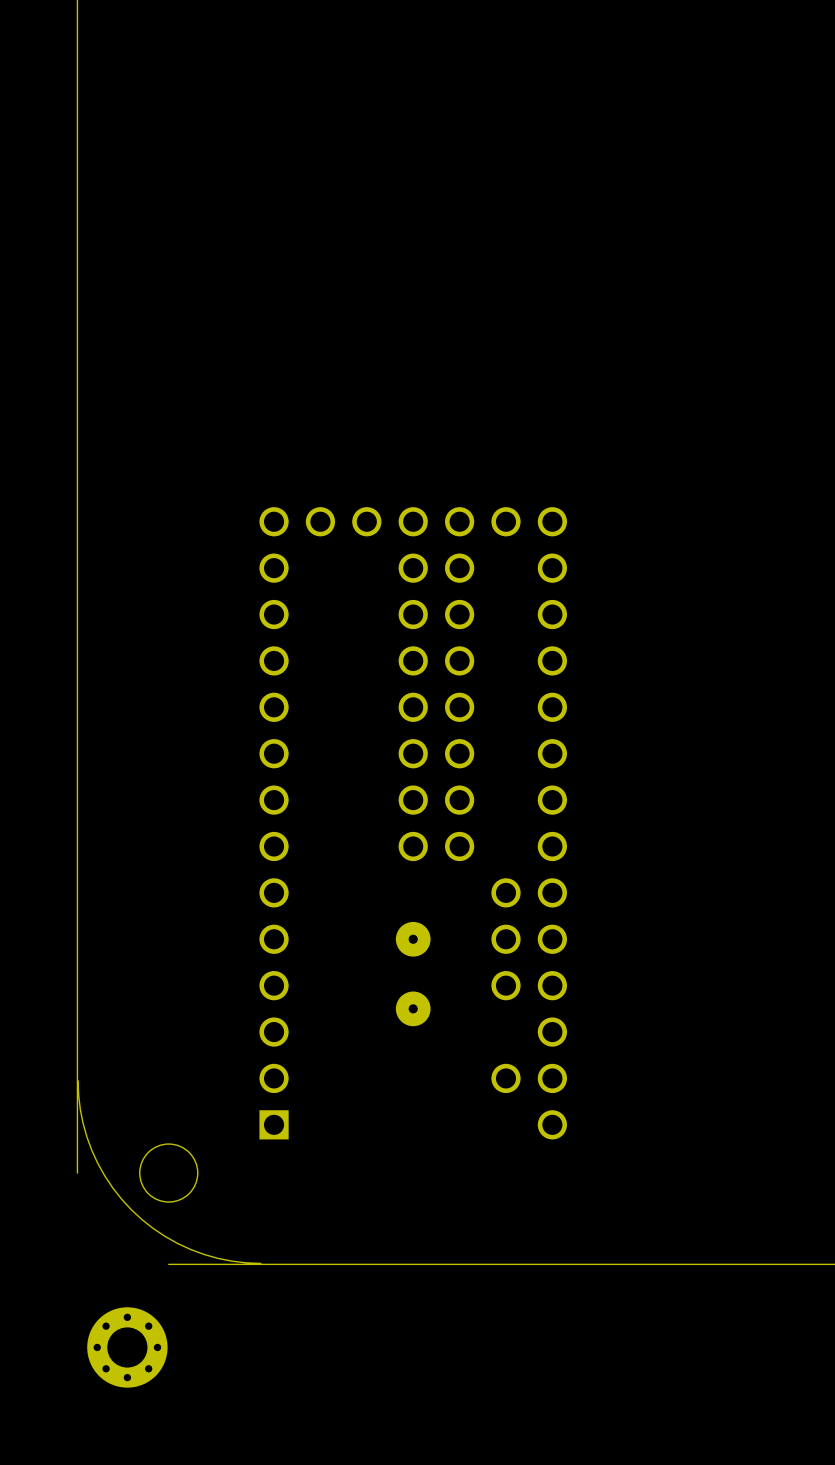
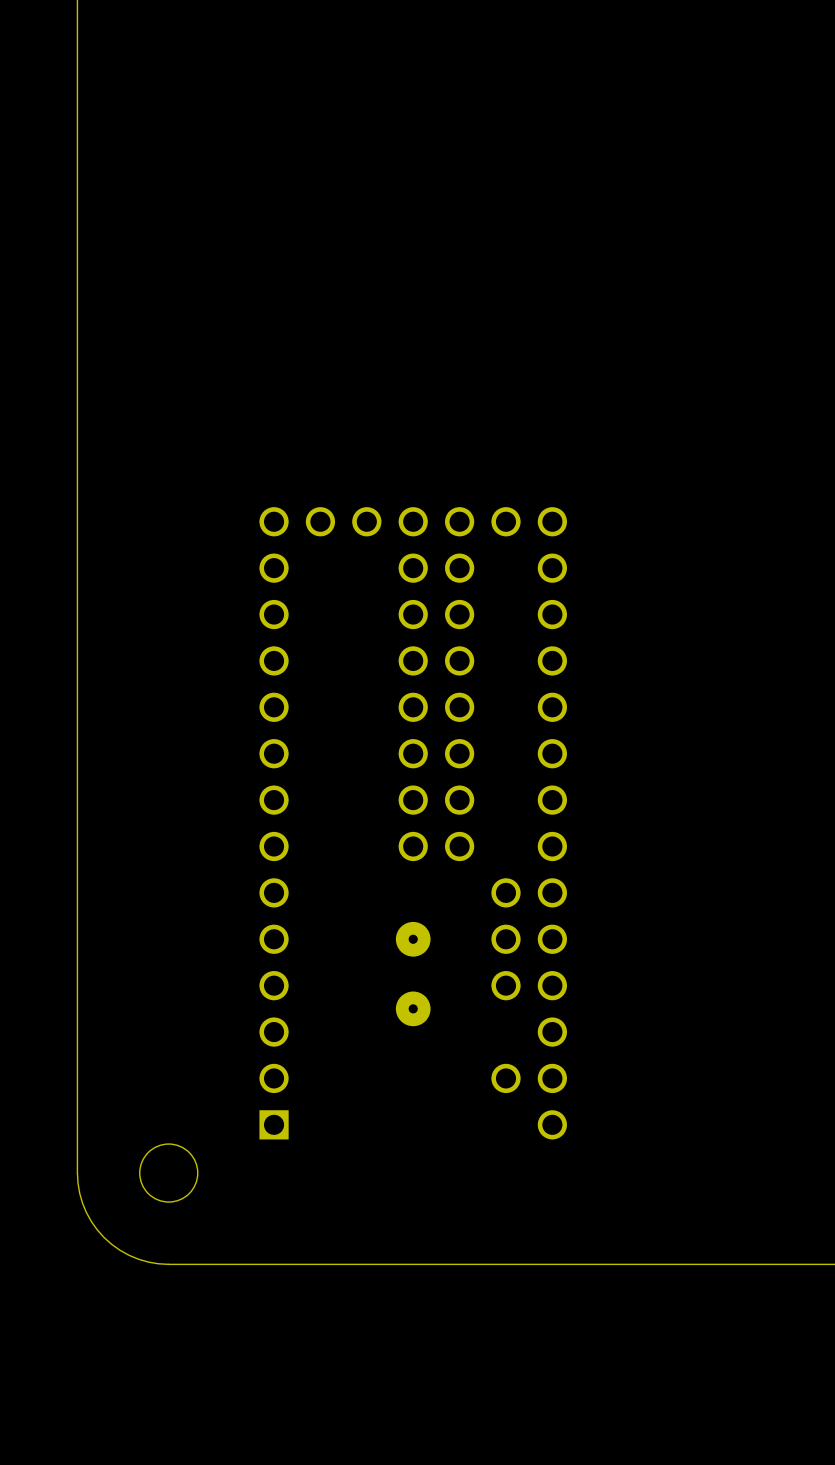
board edge: (78, 1080) (83, 1123) (91, 1150) (104, 1176) (131, 1209) (165, 1236) (190, 1249) (218, 1258) (260, 1263) -> none
board edge: none -> (77, 1173) (79, 1193) (86, 1212) (104, 1237) (120, 1250) (138, 1259) (168, 1264)
part: (127, 1347) -> none

